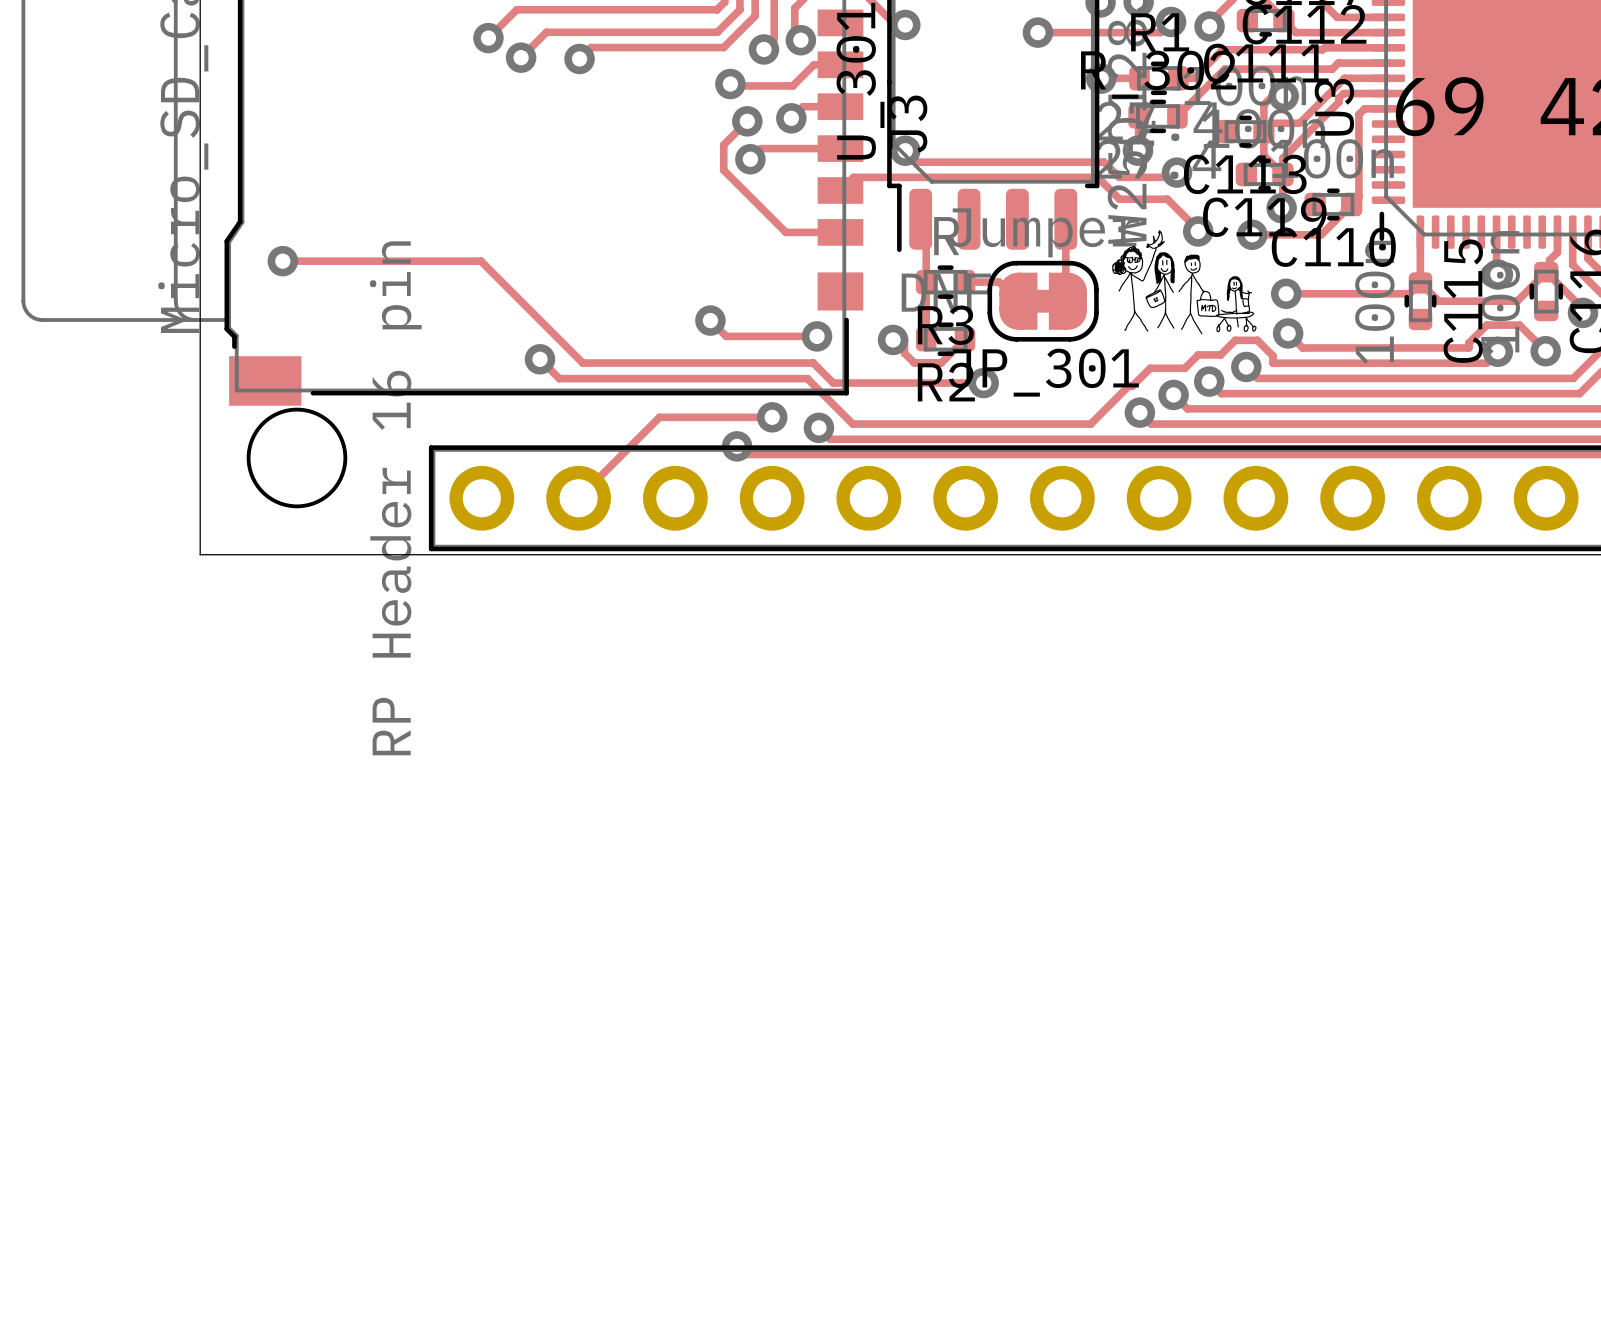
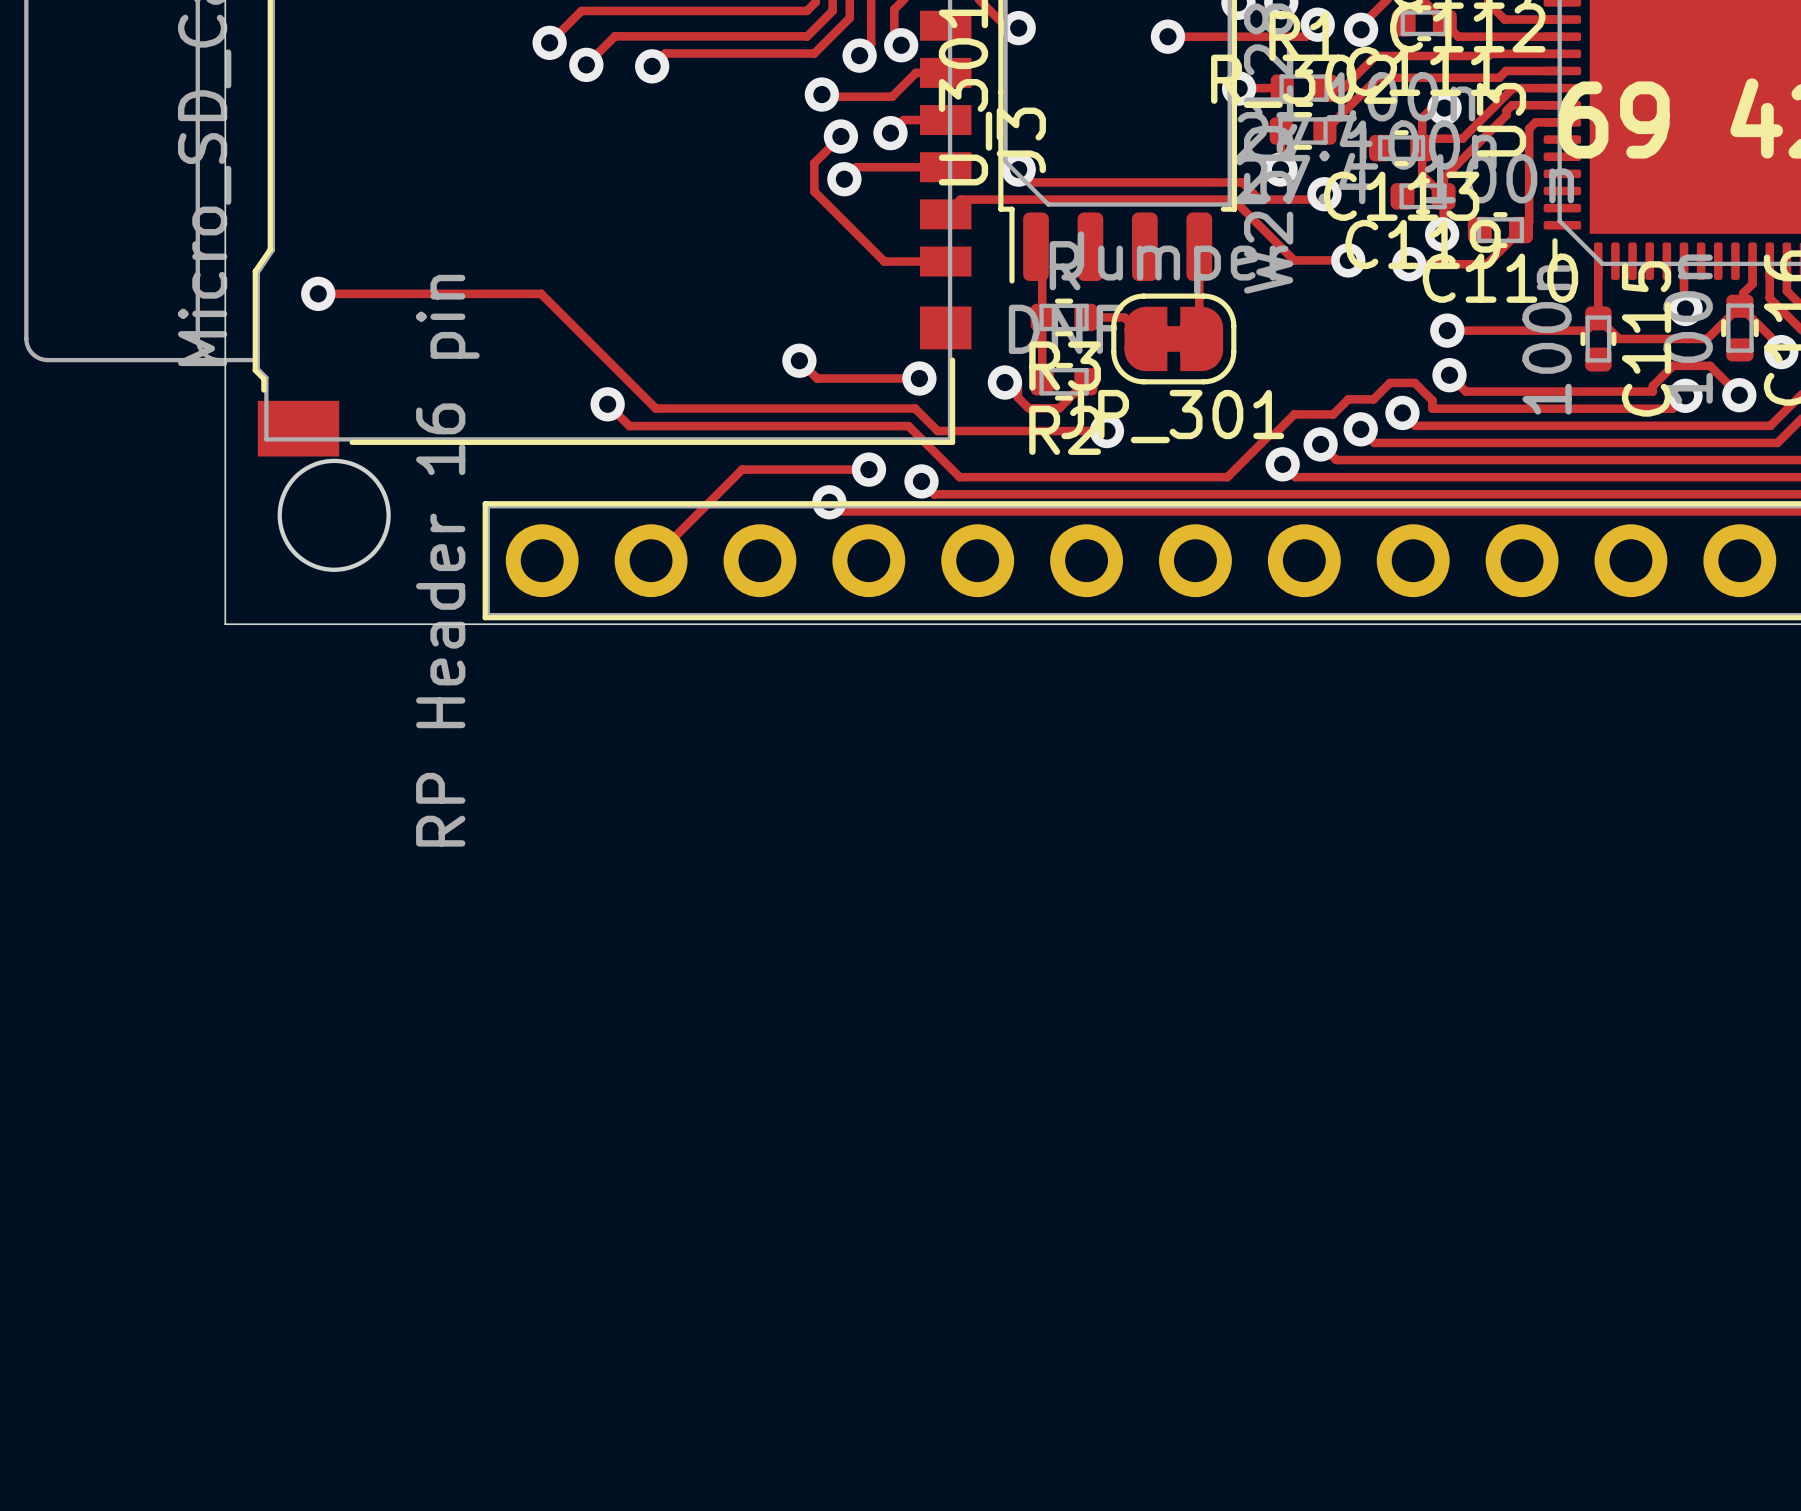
track: (1096, 177) (1119, 199) (1167, 199) (1198, 231) -> (1233, 199) (1294, 260) (1348, 260)
drawing: [1112, 230, 1257, 335] -> none

